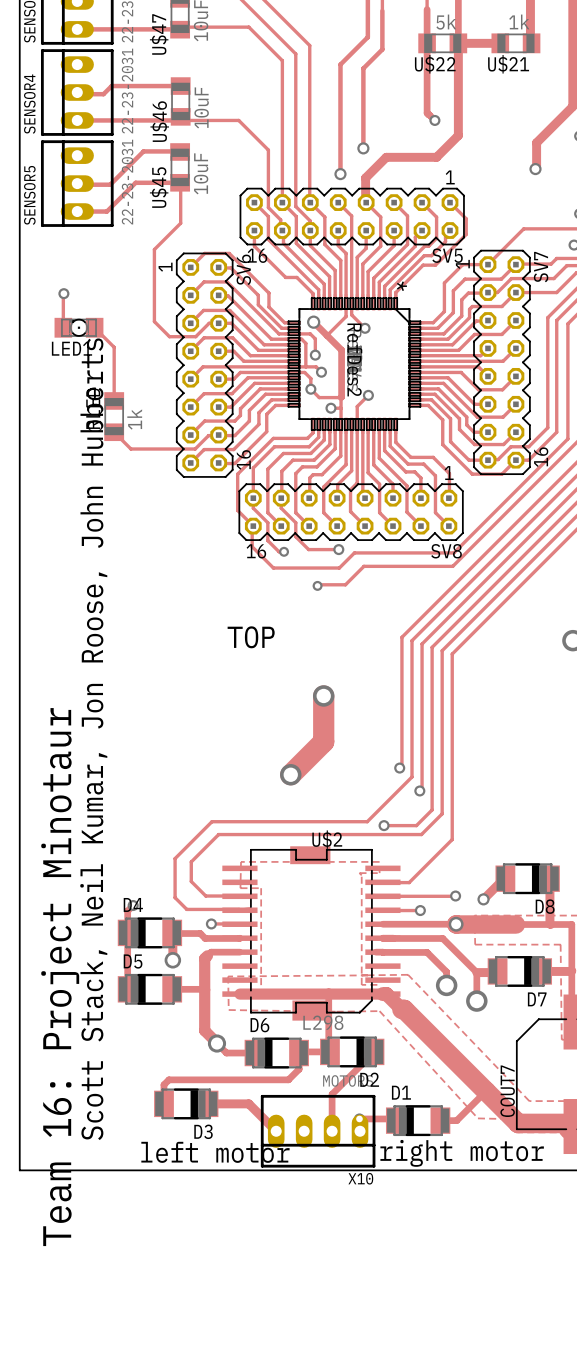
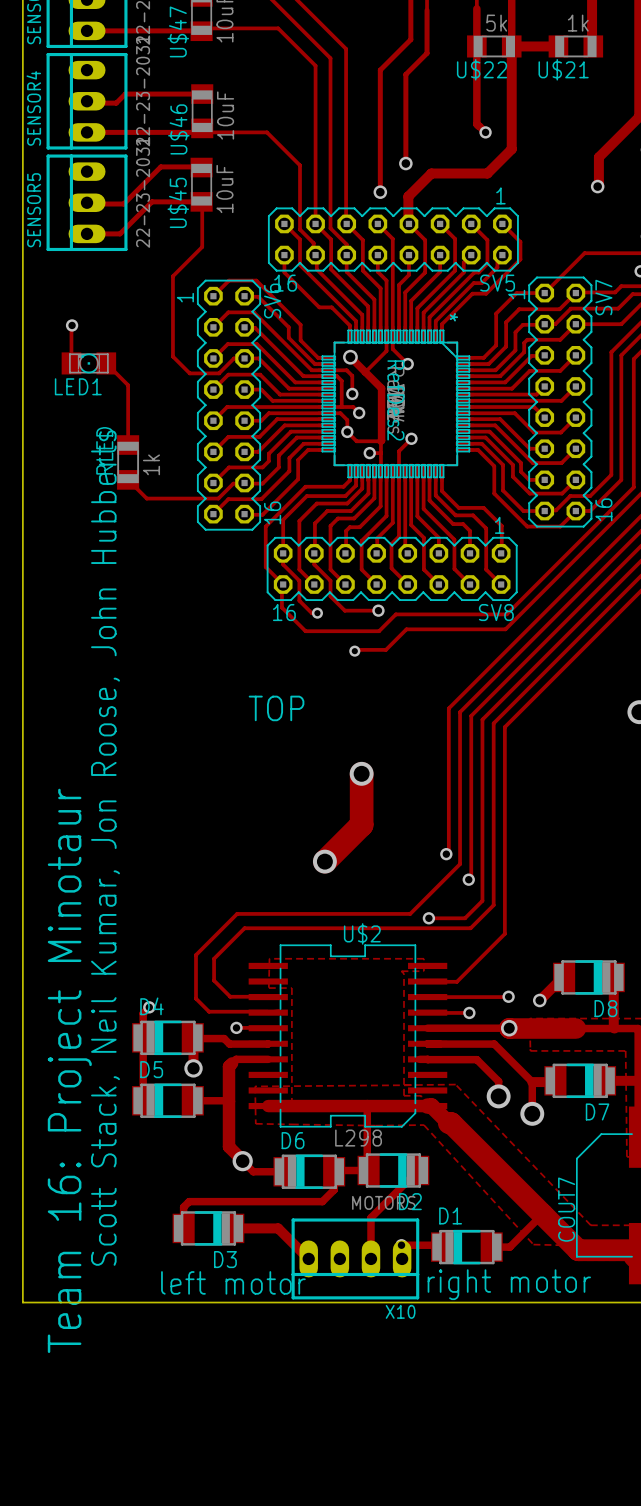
drawing: [290, 846, 331, 865] -> none
drawing: [292, 1000, 329, 1021] -> none

